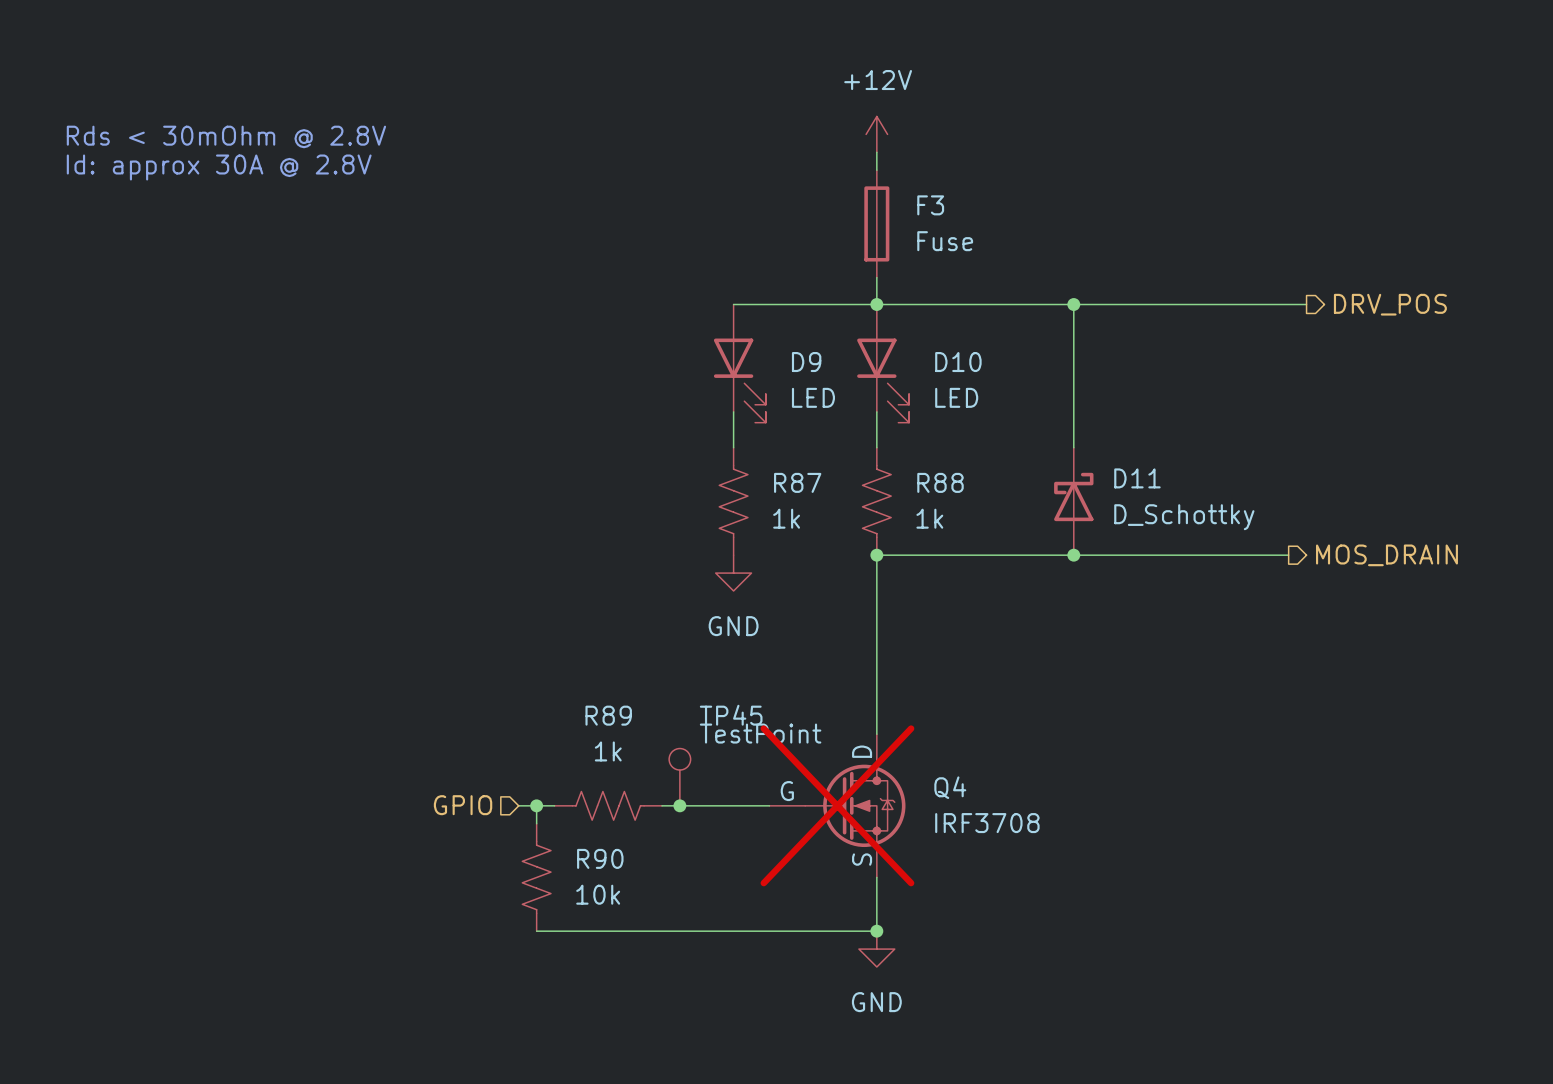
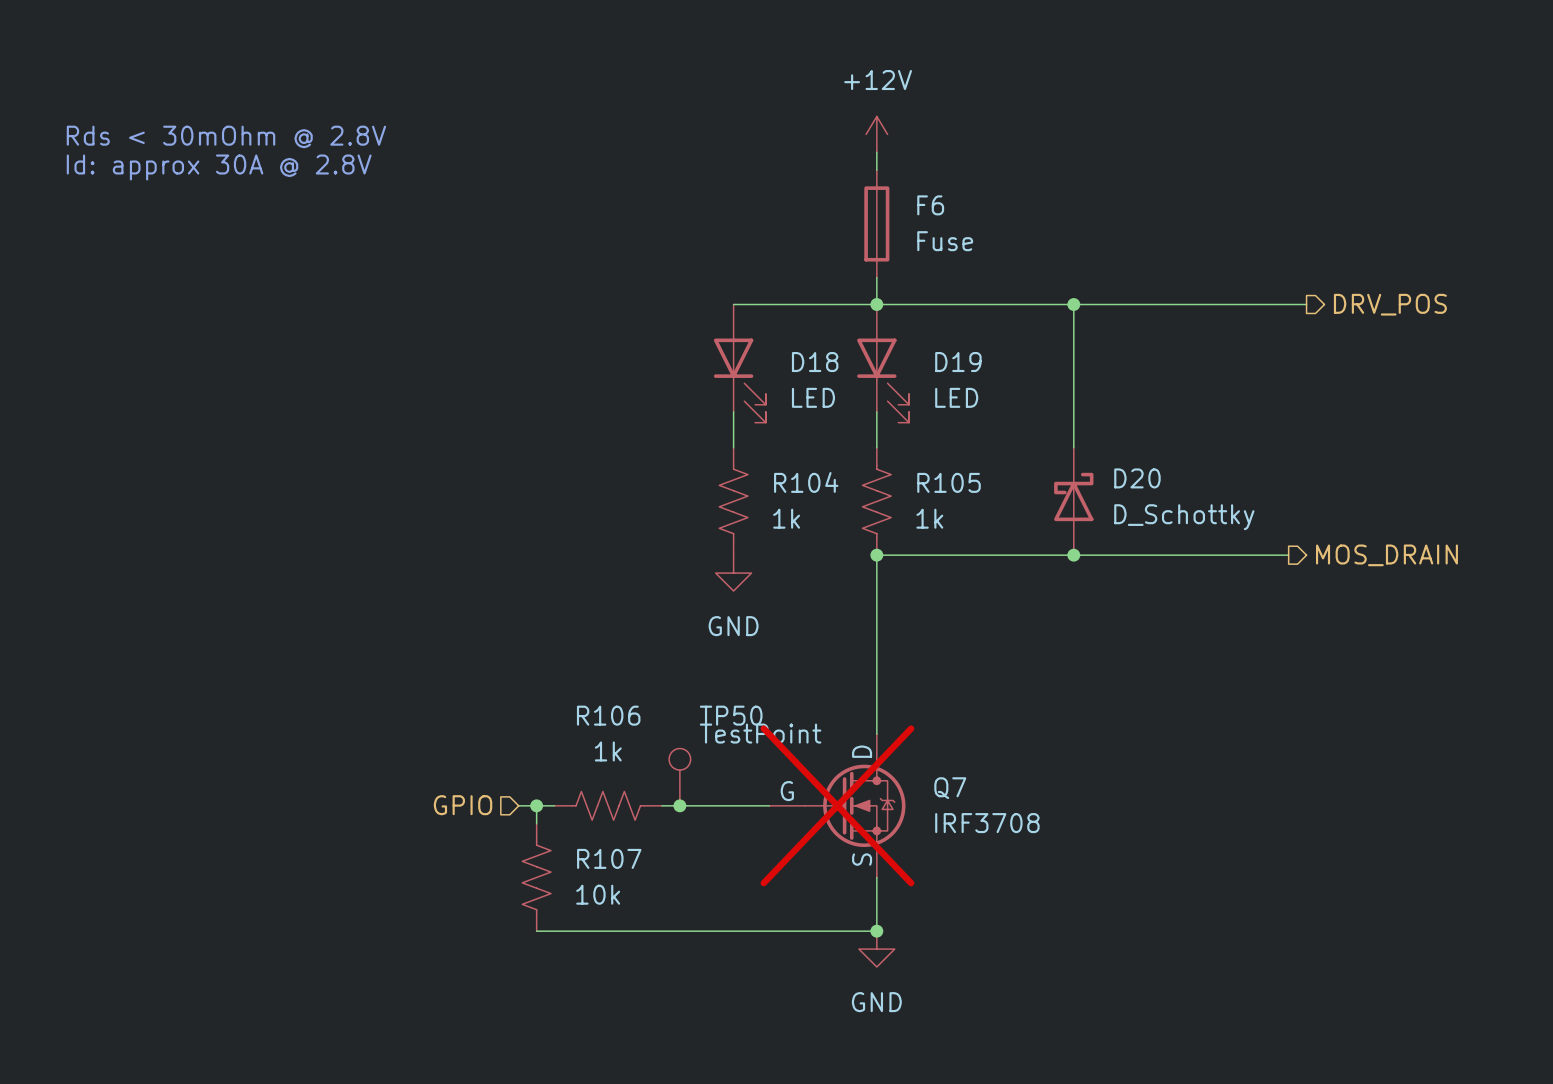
F3 name: F3 (930, 205) -> F6 (930, 205)
D9 name: D9 (806, 362) -> D18 (815, 362)
D10 name: D10 (958, 362) -> D19 (958, 362)
D11 name: D11 (1137, 478) -> D20 (1137, 478)
R87 name: R87 (797, 482) -> R104 (806, 482)
R88 name: R88 (940, 482) -> R105 (949, 482)
R89 name: R89 (608, 715) -> R106 (608, 715)
TP45 name: TP45 (731, 715) -> TP50 (731, 715)
Q4 name: Q4 (950, 787) -> Q7 (950, 788)
R90 name: R90 (600, 858) -> R107 (609, 858)

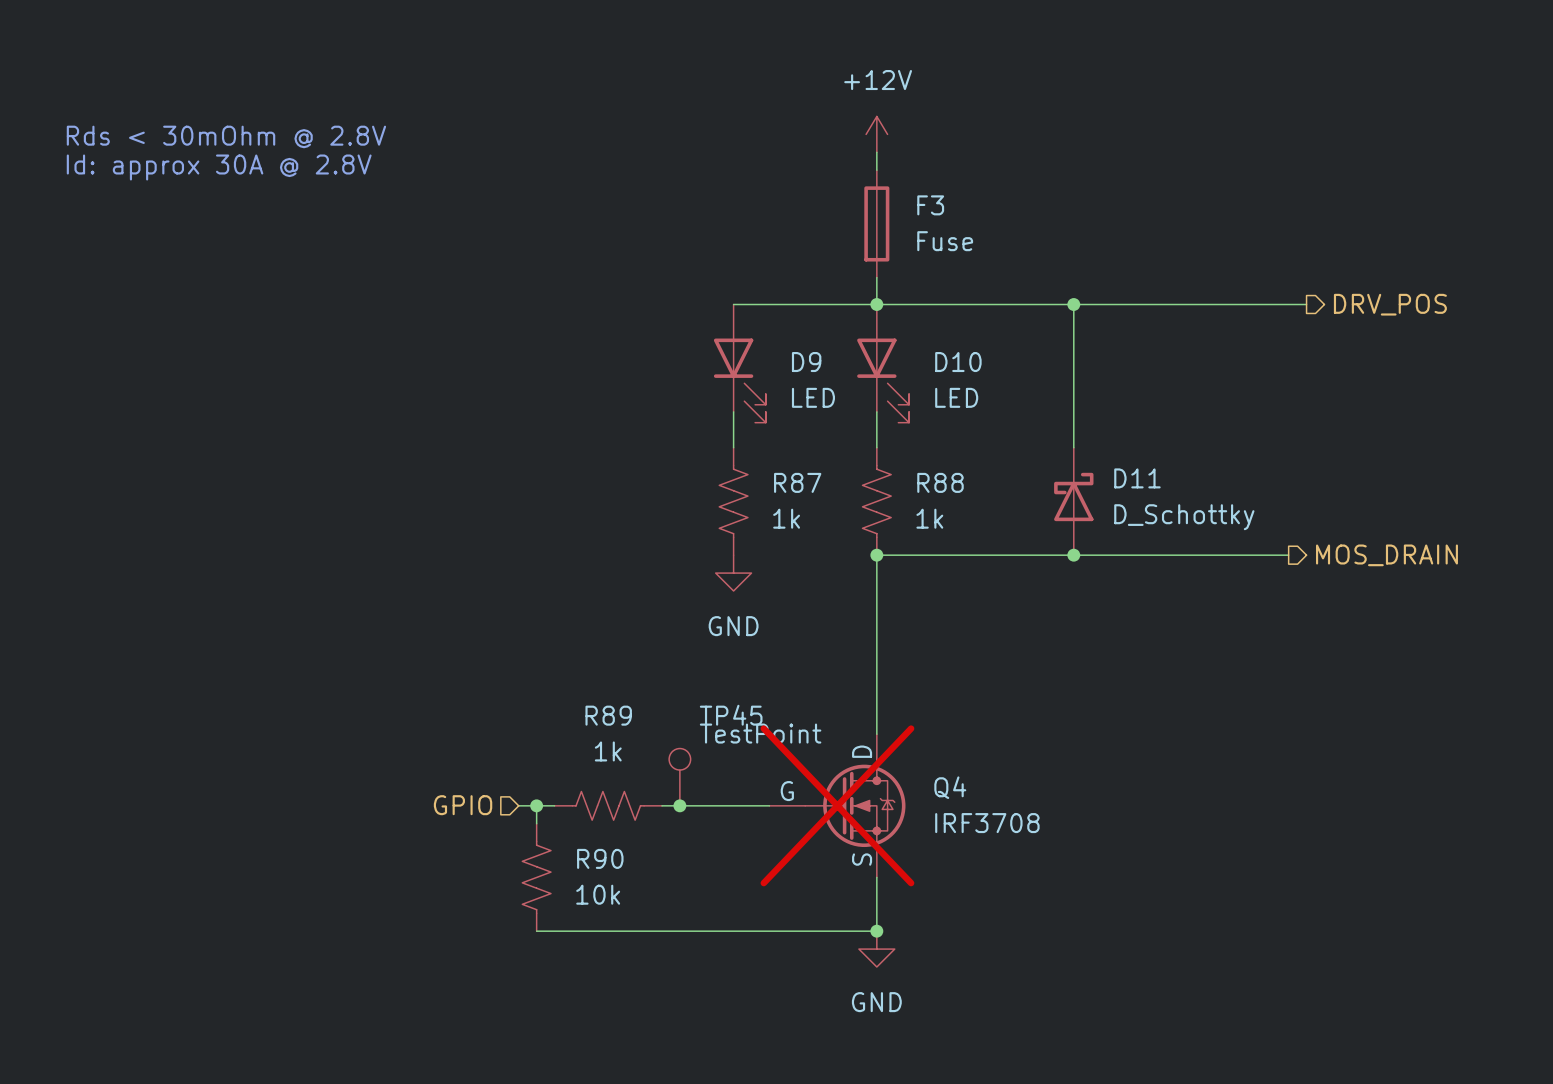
F6 name: F6 (930, 205) -> F3 (930, 205)
D18 name: D18 (815, 362) -> D9 (806, 362)
D19 name: D19 (958, 362) -> D10 (958, 362)
D20 name: D20 (1137, 478) -> D11 (1137, 478)
R104 name: R104 (806, 482) -> R87 (797, 482)
R105 name: R105 (949, 482) -> R88 (940, 482)
R106 name: R106 (608, 715) -> R89 (608, 715)
TP50 name: TP50 (731, 715) -> TP45 (731, 715)
Q7 name: Q7 (950, 788) -> Q4 (950, 787)
R107 name: R107 (609, 858) -> R90 (600, 858)

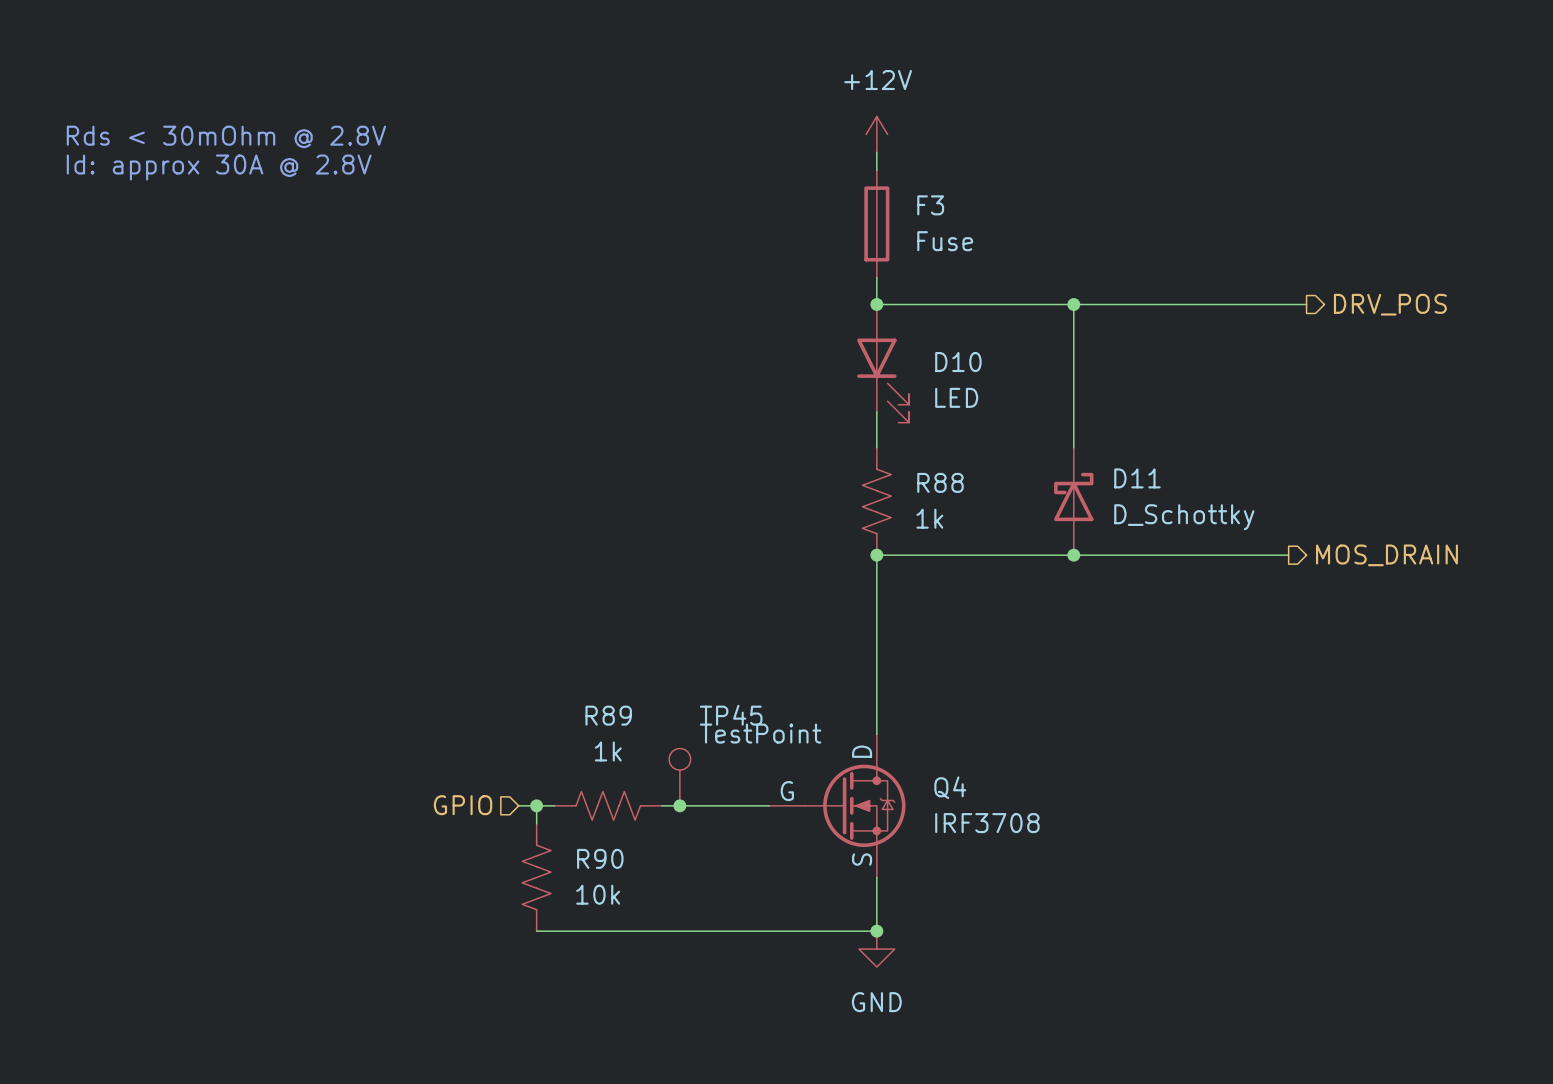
wire: (733, 304) (876, 304) -> none
D9: LED (739, 363) -> none
wire: (733, 411) (733, 447) -> none
R87: 1k (733, 501) -> none
power symbol: GND (733, 573) -> none
Q4 do-not-place cross: (837, 805) -> none

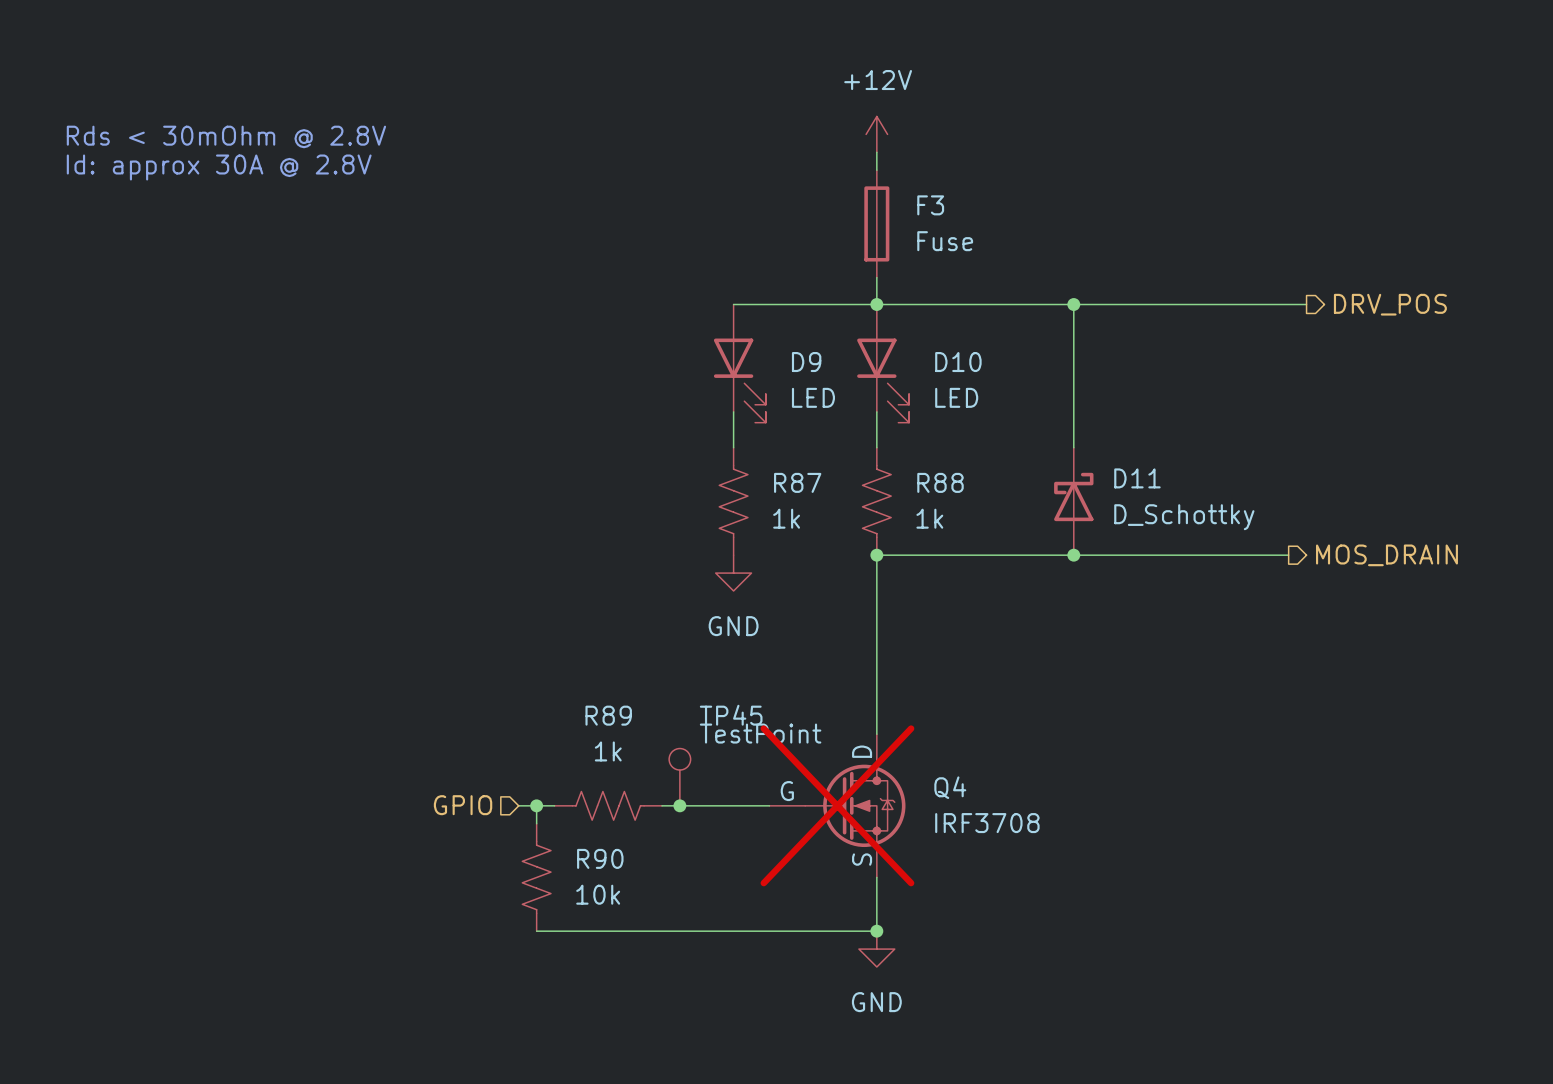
wire: none -> (733, 304) (876, 304)
D9: none -> LED (739, 363)
wire: none -> (733, 411) (733, 447)
R87: none -> 1k (733, 501)
power symbol: none -> GND (733, 573)
Q4 do-not-place cross: none -> (837, 805)

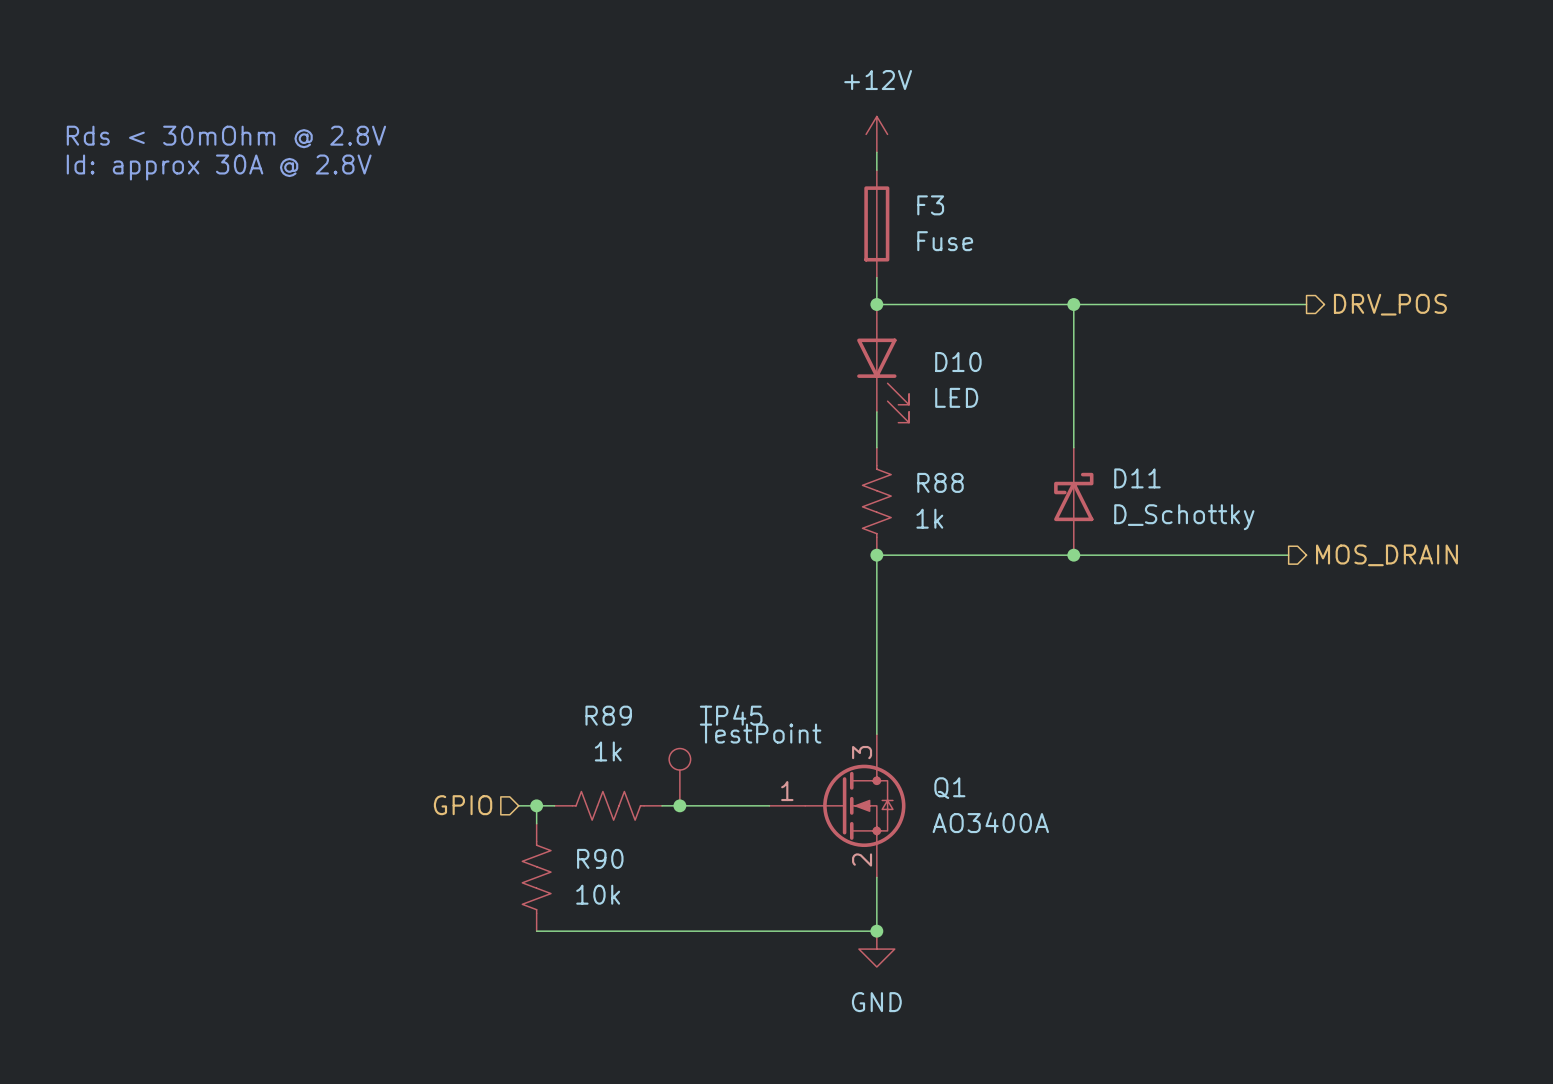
wire: (733, 304) (876, 304) -> none
D9: LED (739, 363) -> none
wire: (733, 411) (733, 447) -> none
R87: 1k (733, 501) -> none
power symbol: GND (733, 573) -> none
Q4: IRF3708 (837, 805) -> none
Q1: none -> AO3400A (837, 805)

